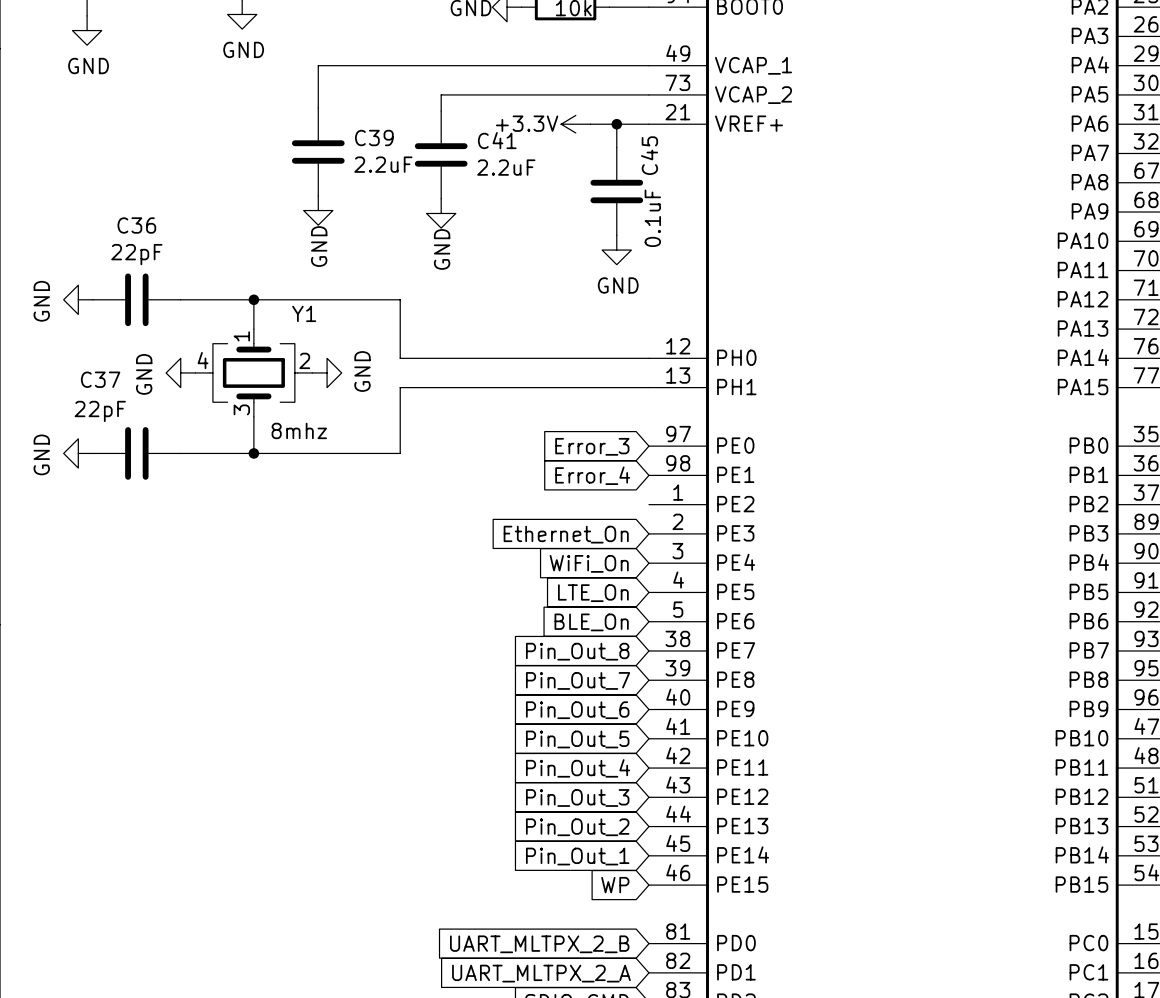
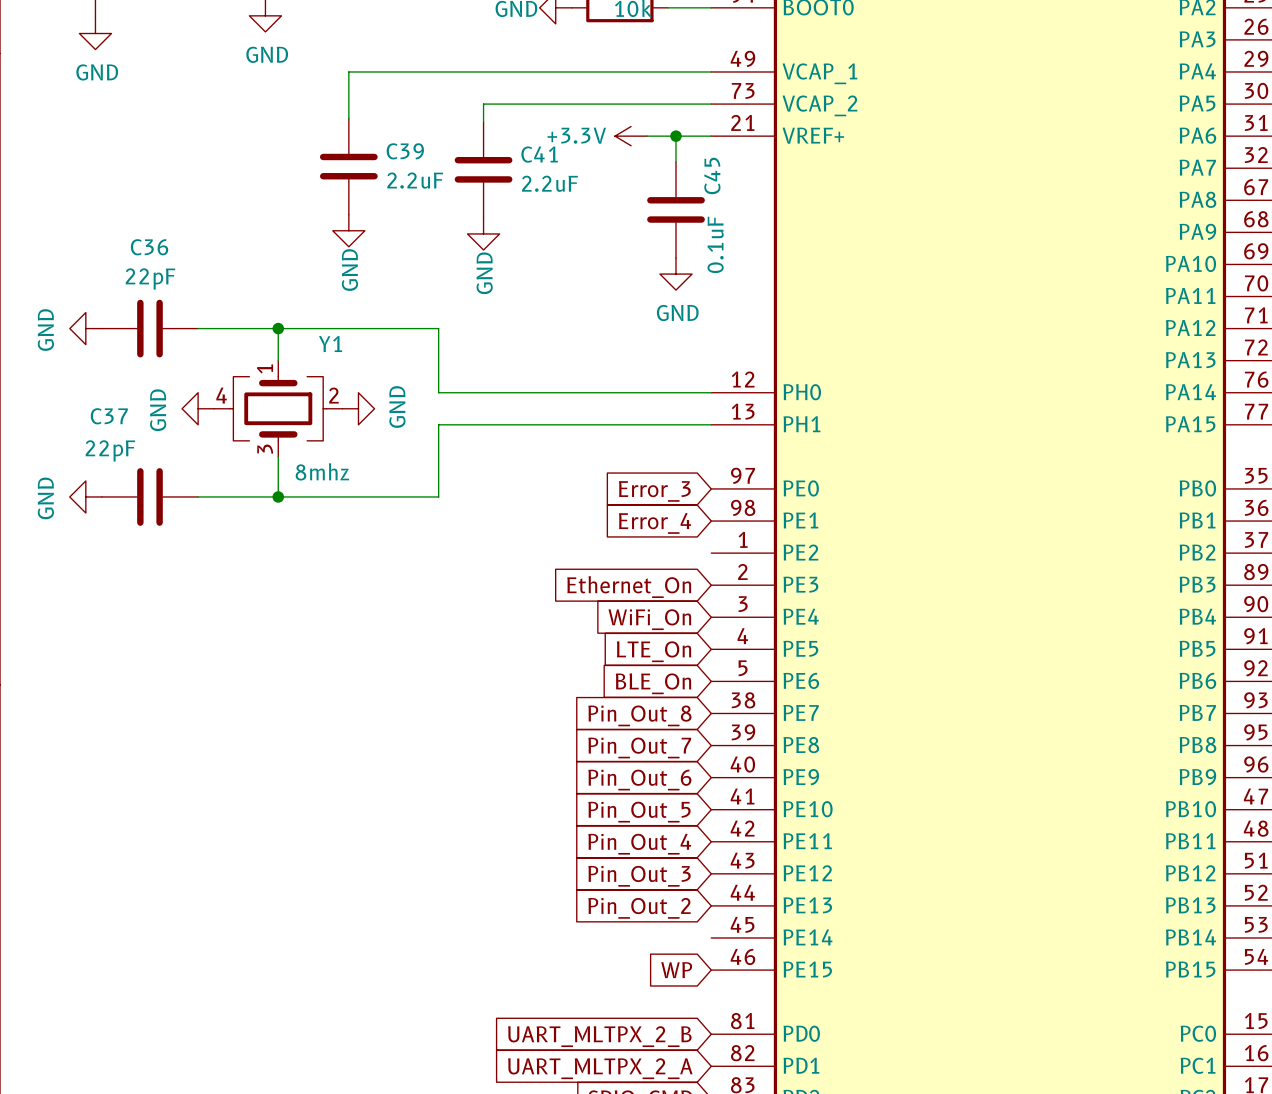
global label: Pin_Out_1 (577, 856) -> none

